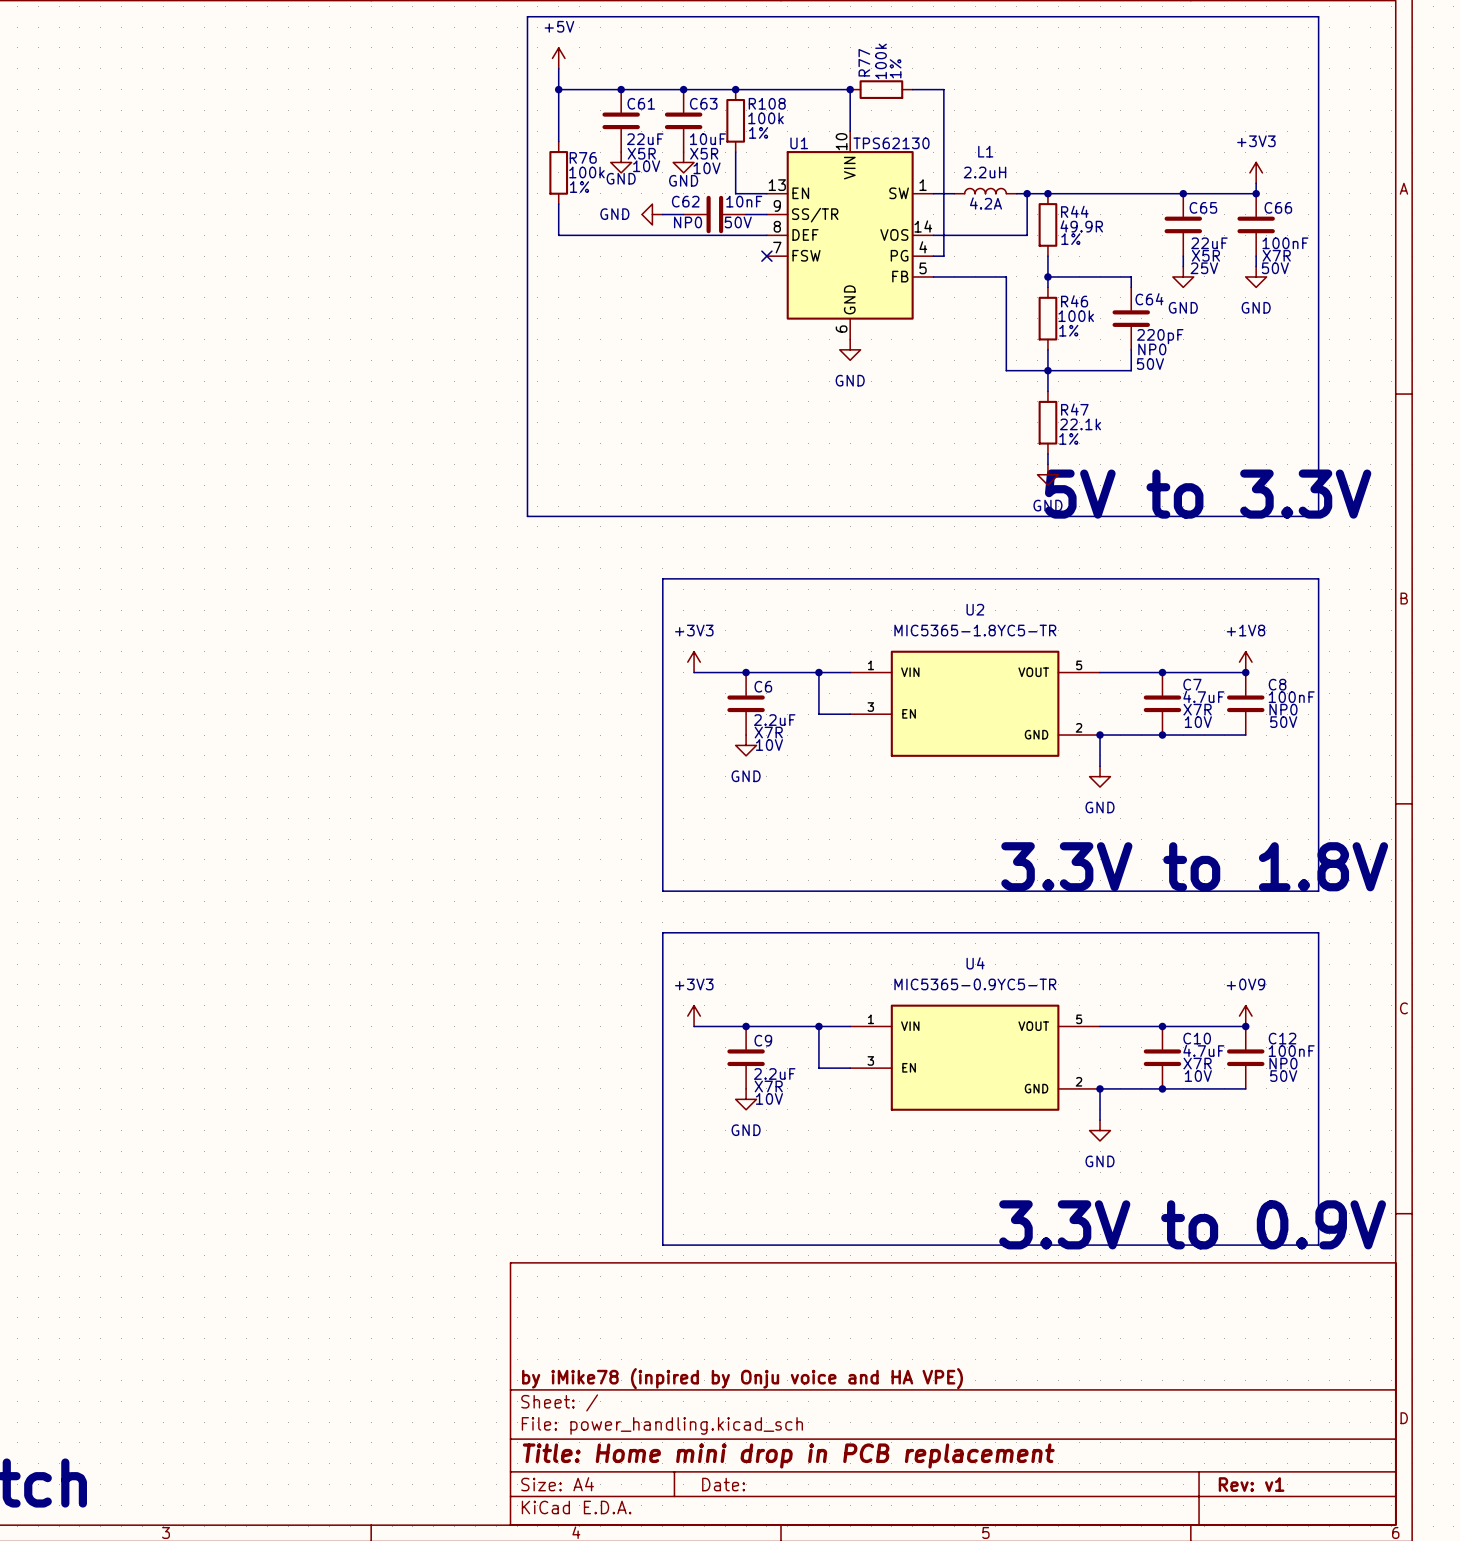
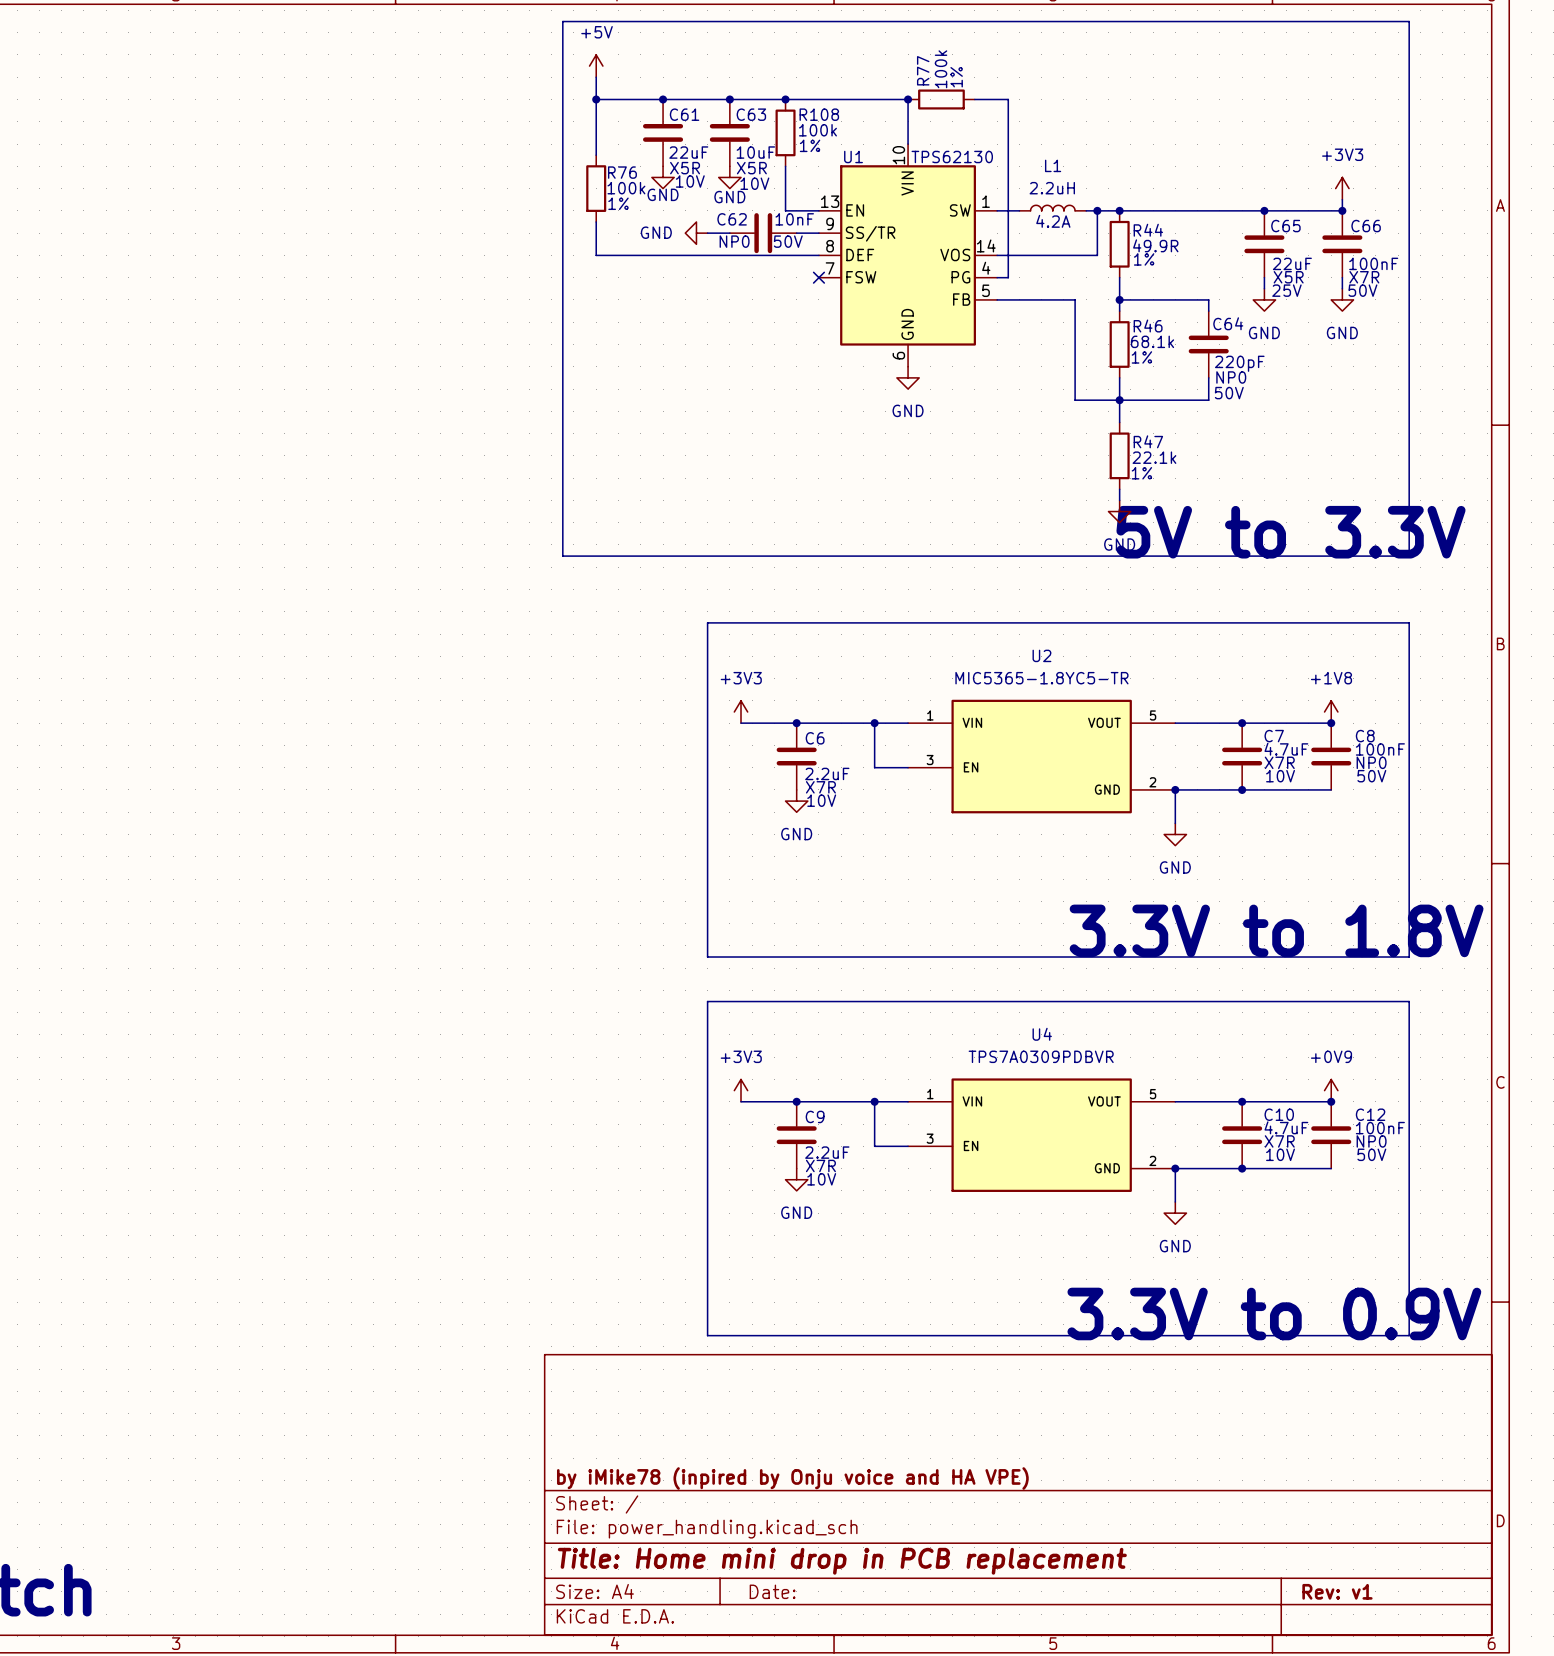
R46 value: 100k (1076, 316) -> 68.1k (1152, 341)
U4 value: MIC5365-0.9YC5-TR (975, 984) -> TPS7A0309PDBVR (1041, 1056)

